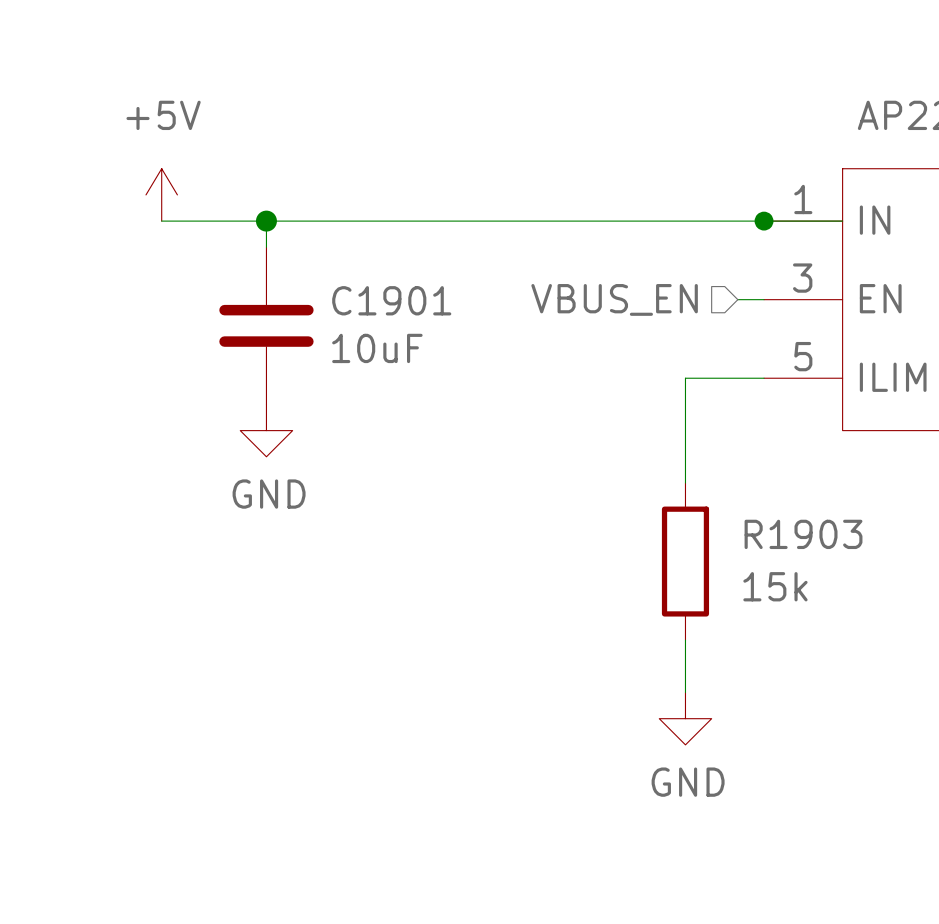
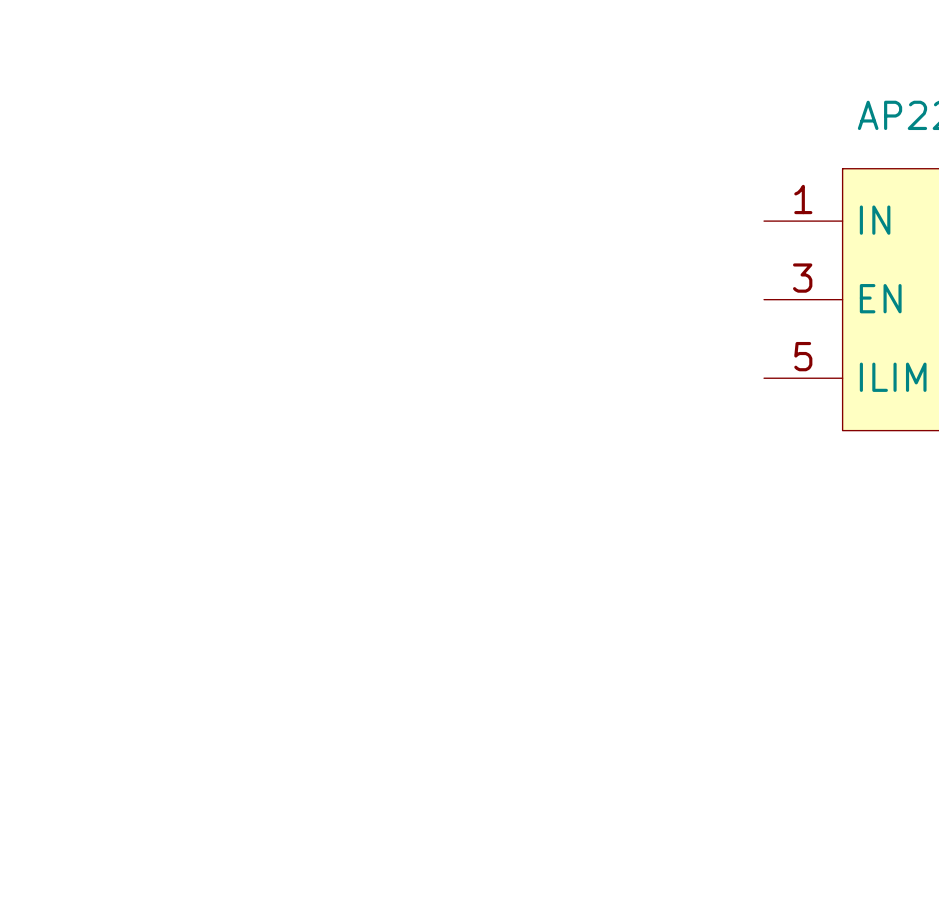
power symbol: +5V (161, 194) -> none
wire: (161, 221) (842, 221) -> none
wire: (266, 221) (266, 247) -> none
junction: (266, 221) -> none
junction: (764, 221) -> none
hierarchical label: VBUS_EN (614, 299) -> none
wire: (737, 299) (764, 299) -> none
C1901: 10uF (266, 325) -> none
wire: (764, 378) (685, 378) (685, 482) -> none
power symbol: GND (266, 430) -> none
R1903: 15k (685, 561) -> none
wire: (685, 640) (685, 692) -> none
power symbol: GND (685, 718) -> none

